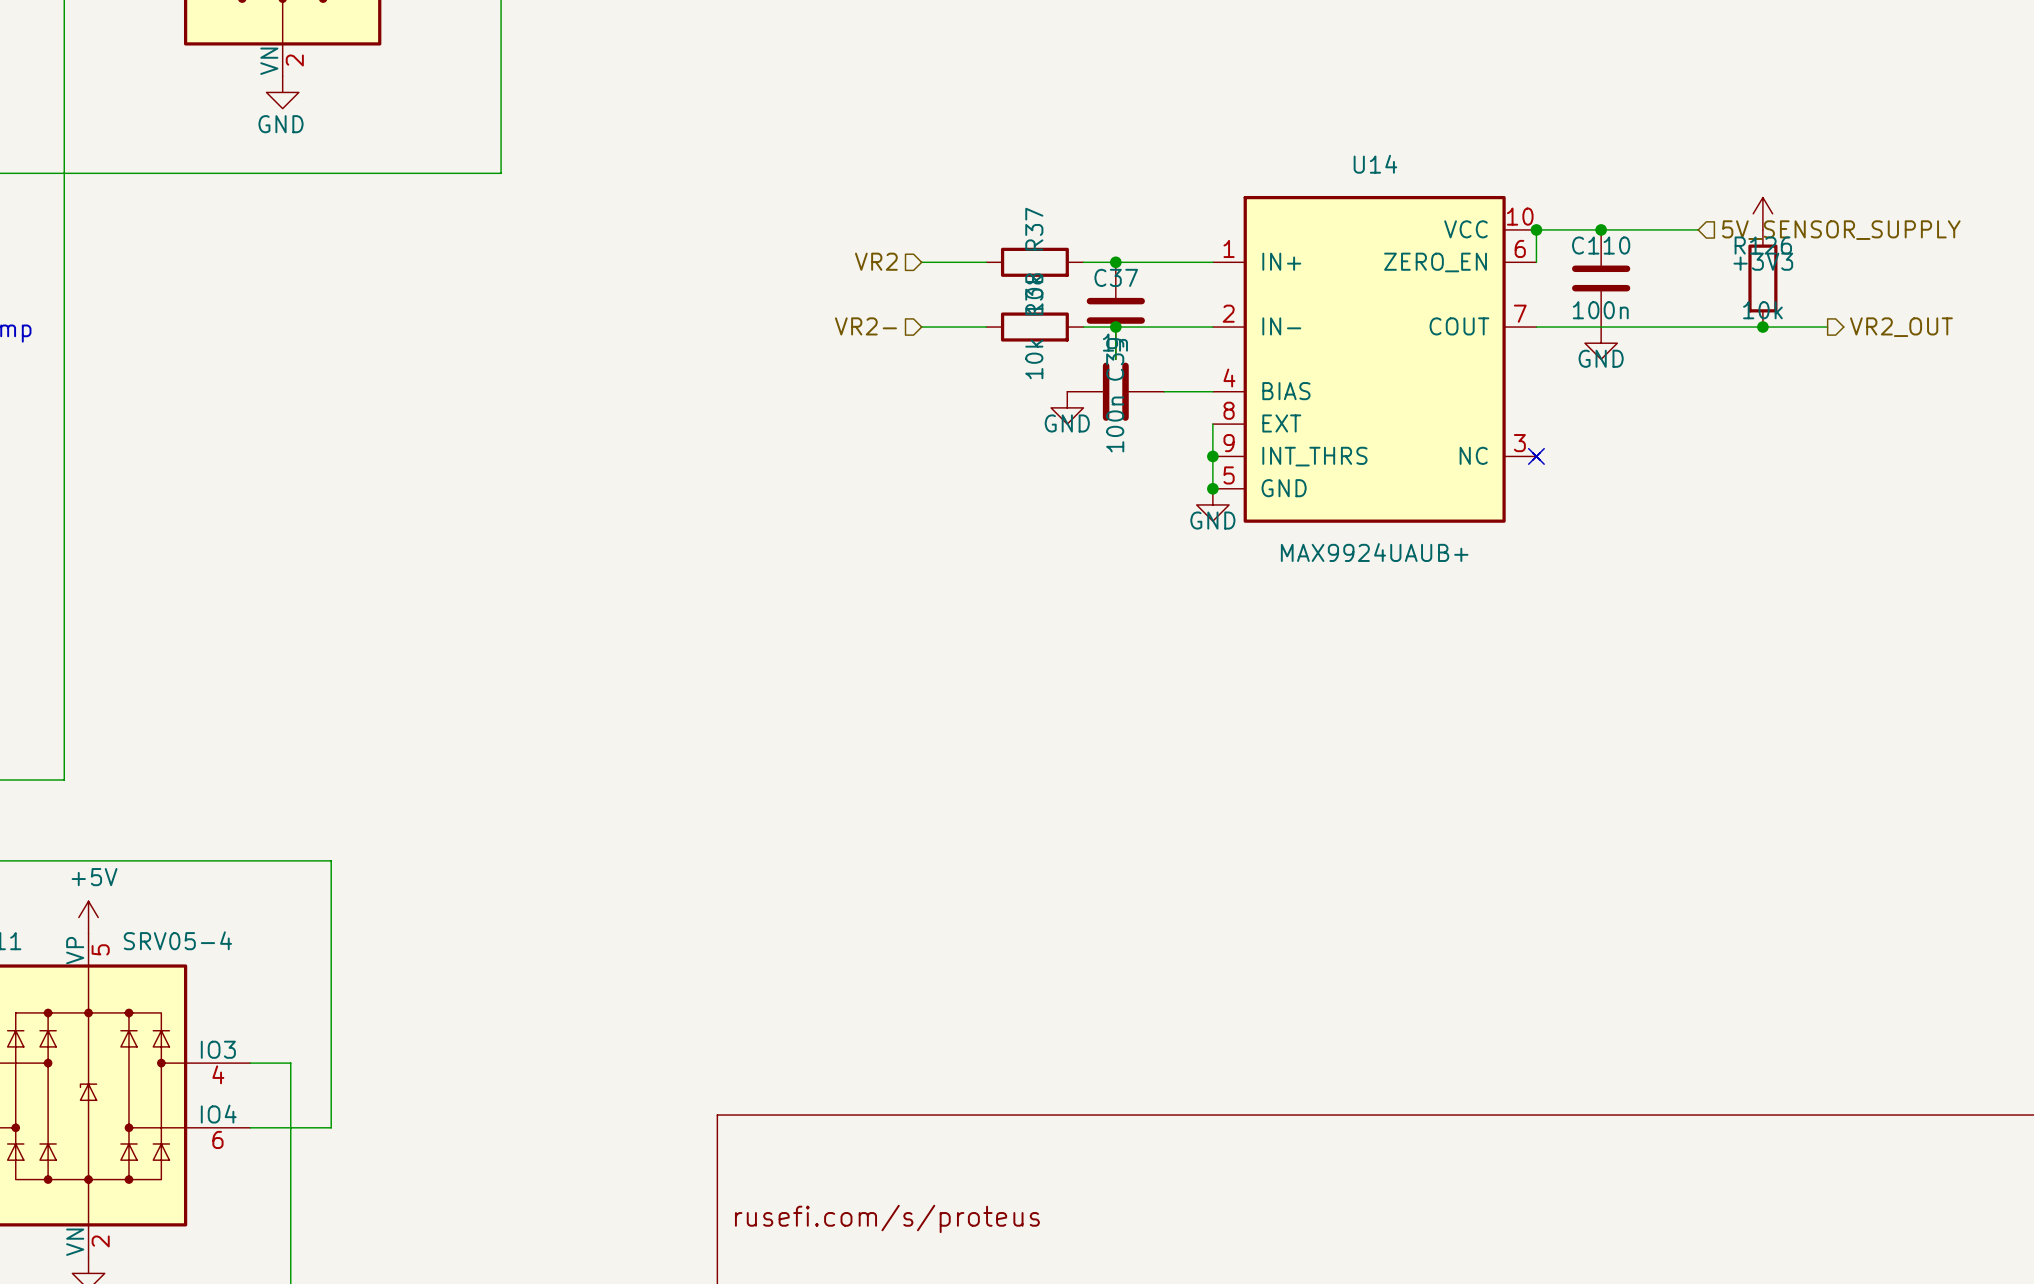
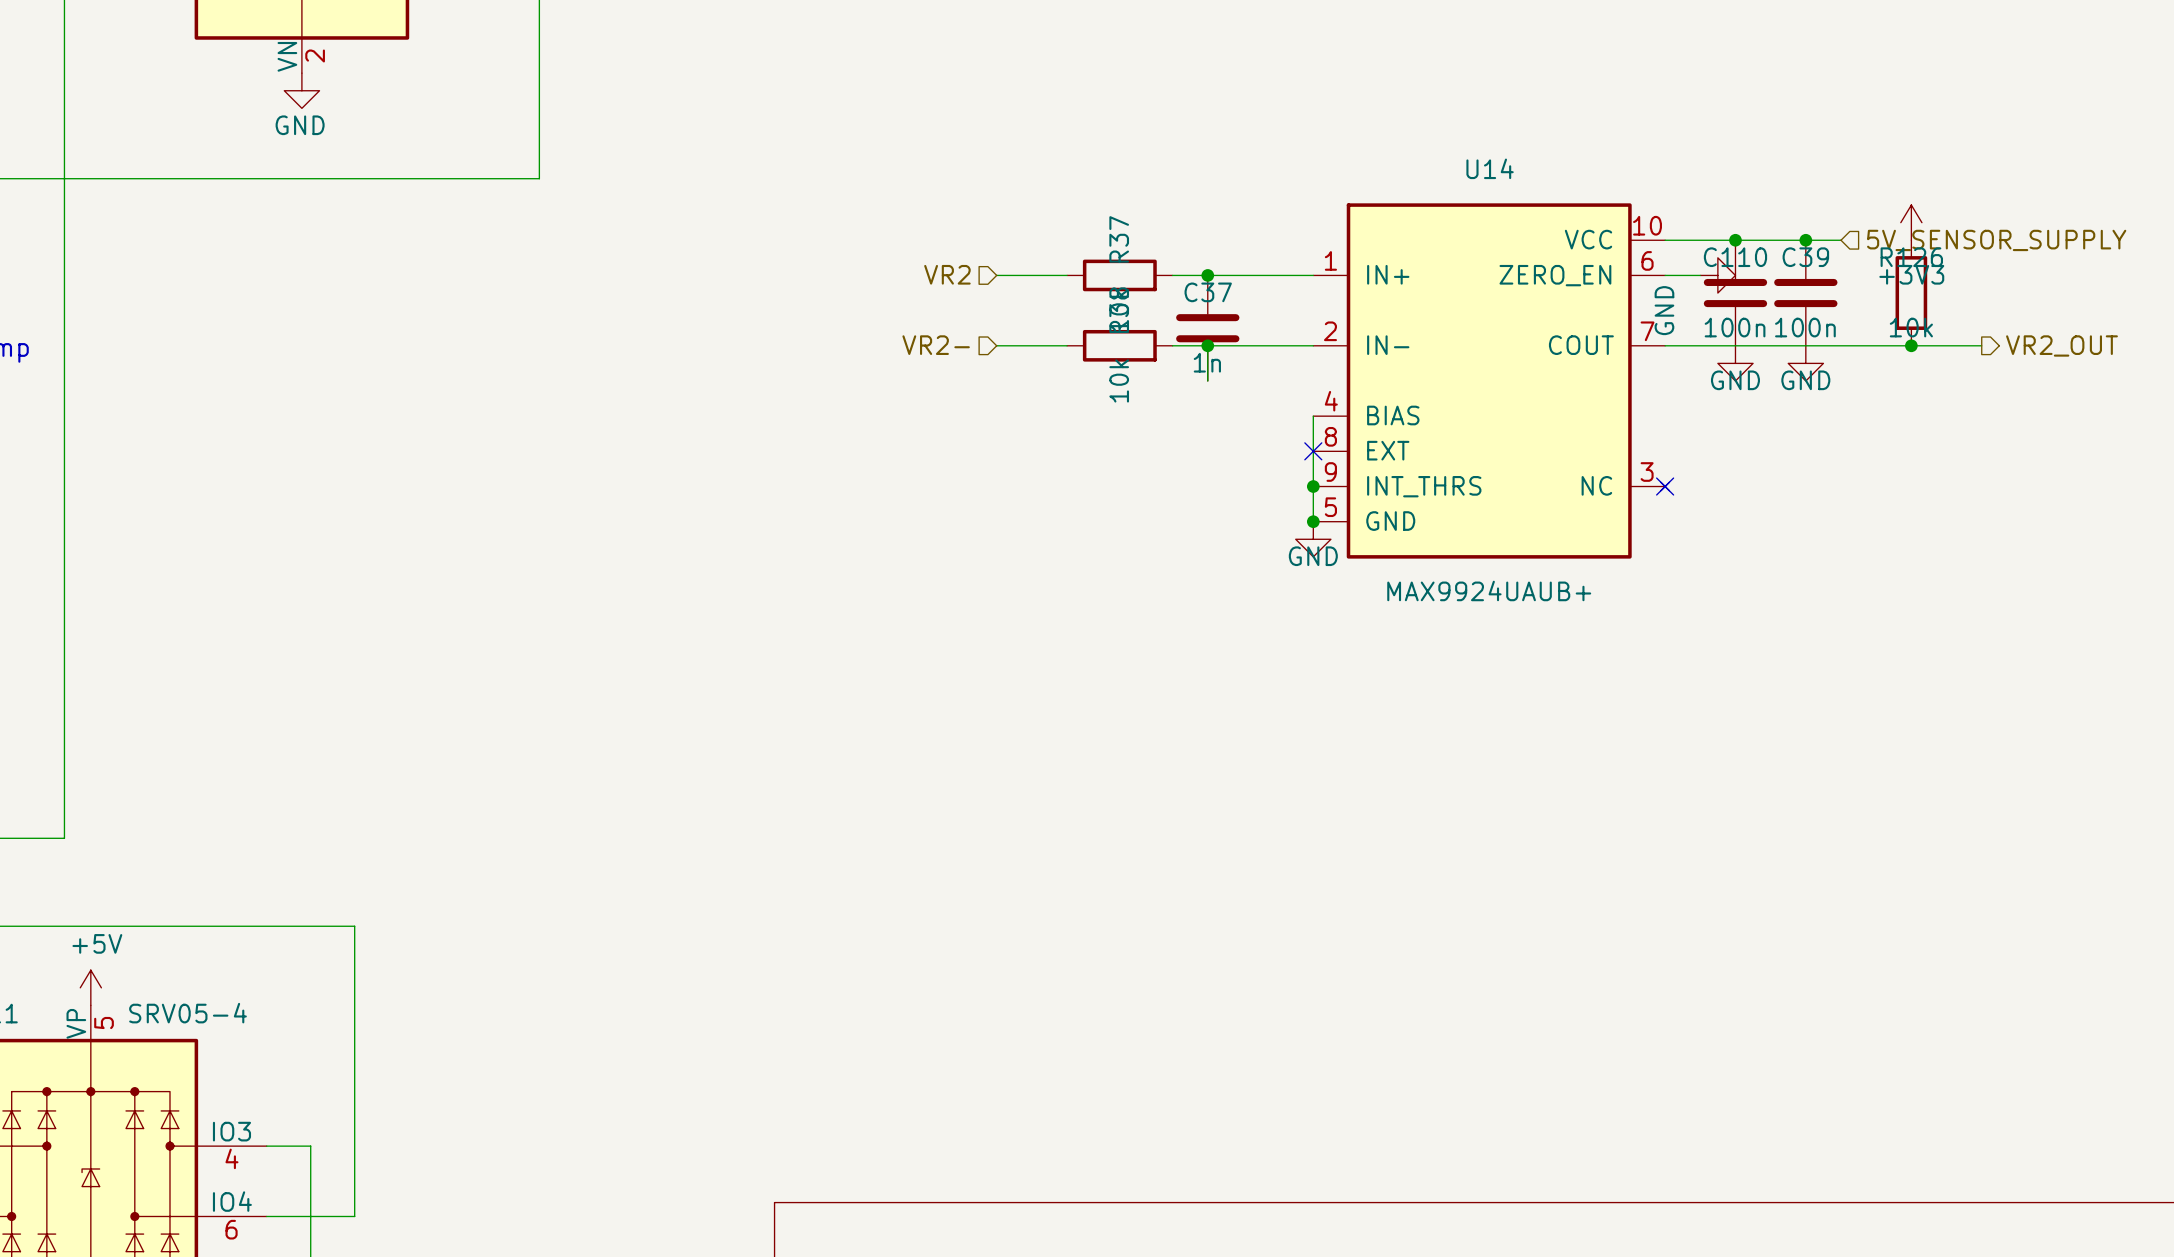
wire: (1536, 229) (1536, 262) -> (1700, 275) (1665, 275)
junction: (1536, 229) -> none
junction: none -> (1805, 240)
power symbol: none -> GND (1717, 275)
power symbol: none -> GND (1805, 363)
C39 rotation: 0° (1115, 391) -> 90° clockwise (1805, 293)
C39 position: (1115, 391) -> (1805, 293)
wire: (1164, 391) (1212, 391) -> (1313, 451) (1313, 416)
power symbol: GND (1067, 407) -> none
no-connect mark: none -> (1313, 451)

